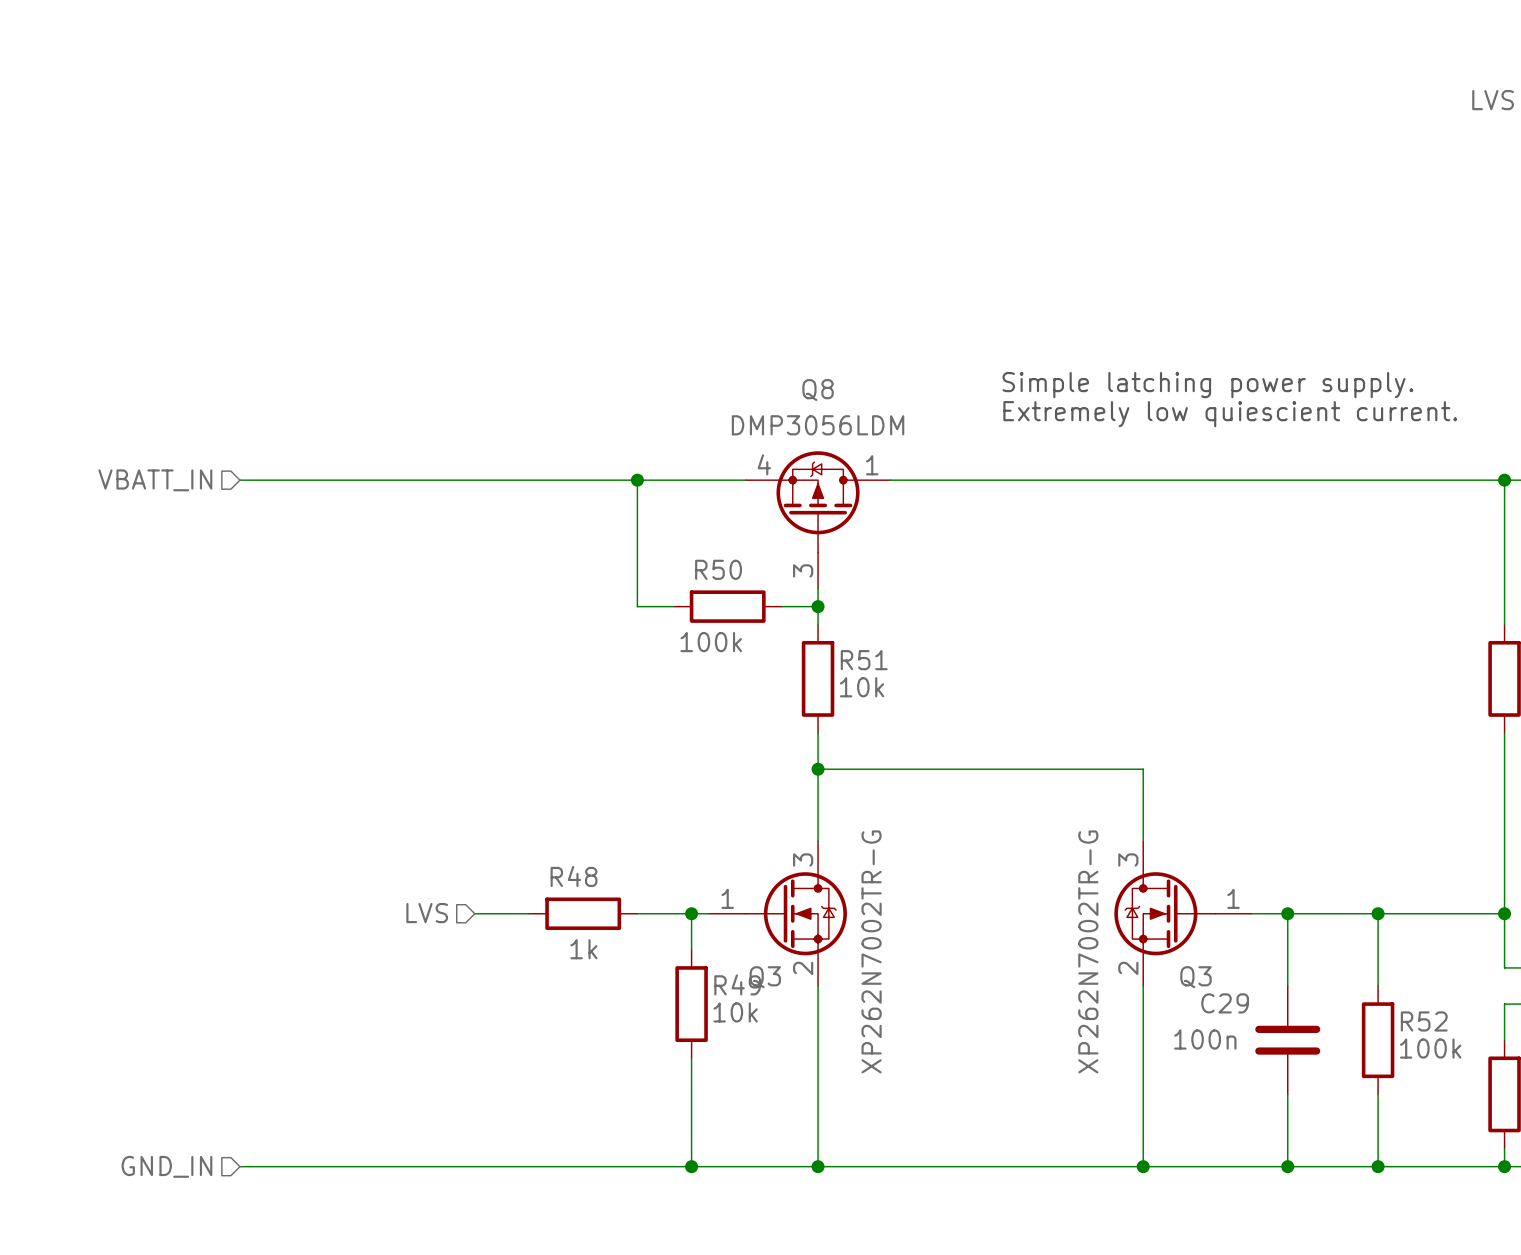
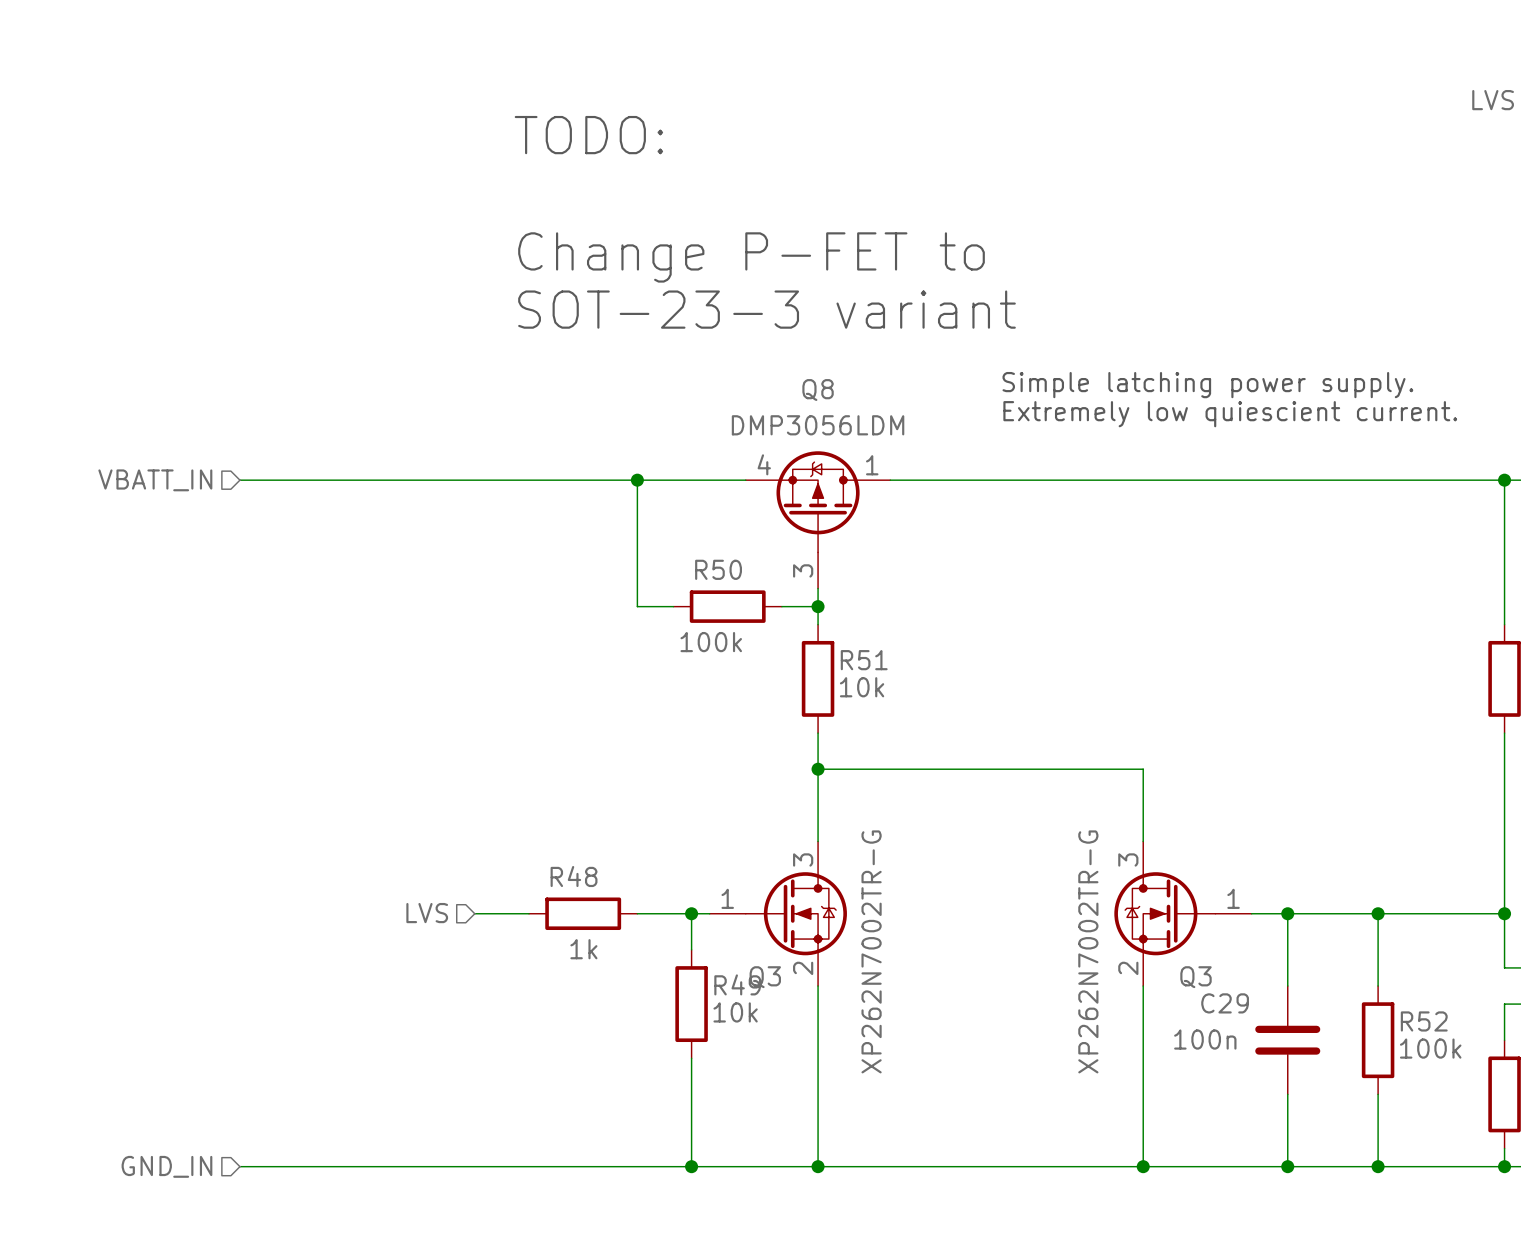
text: none -> TODO: (588, 135)
text: none -> Change P-FET to (751, 257)
text: none -> SOT-23-3 variant (766, 309)

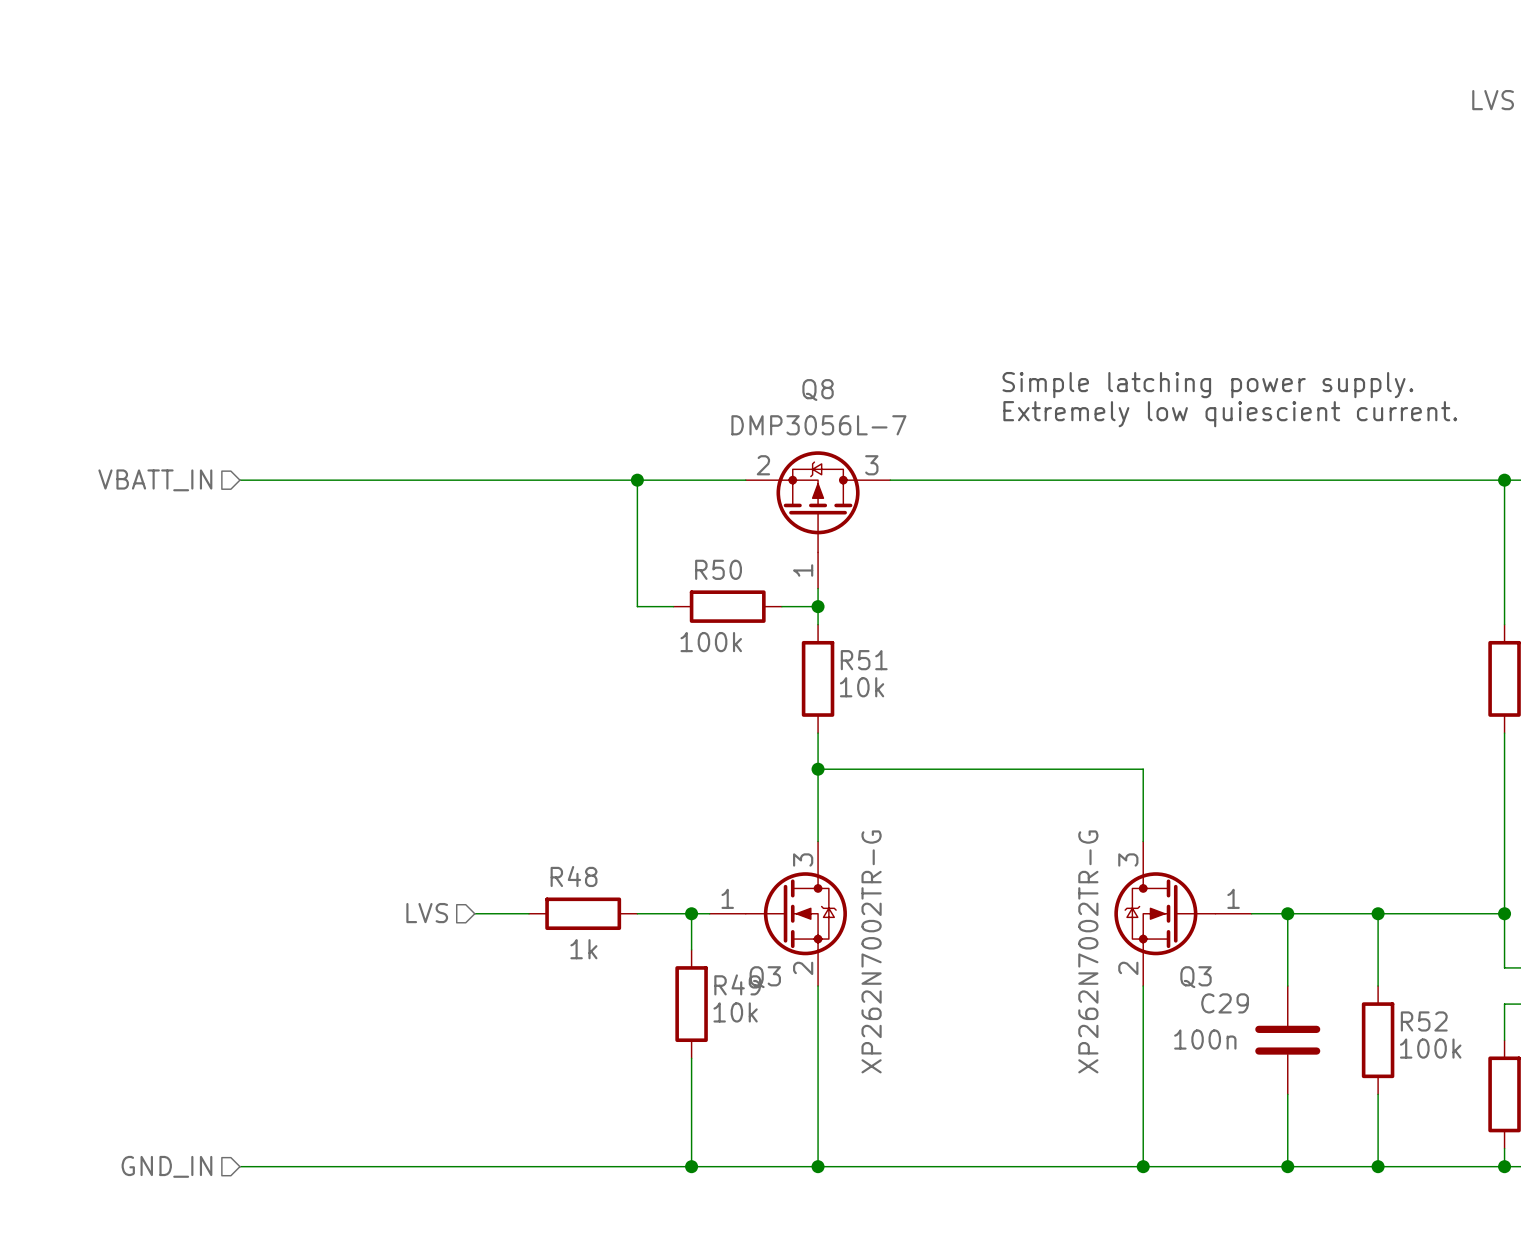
text: TODO: (588, 135) -> none
text: Change P-FET to (751, 257) -> none
text: SOT-23-3 variant (766, 309) -> none
Q8 value: DMP3056LDM (818, 425) -> DMP3056L-7 (818, 425)
Q8 pin number: 4 (764, 464) -> 2 (763, 465)
Q8 pin number: 1 (872, 465) -> 3 (871, 465)
Q8 pin number: 3 (803, 570) -> 1 (803, 570)

